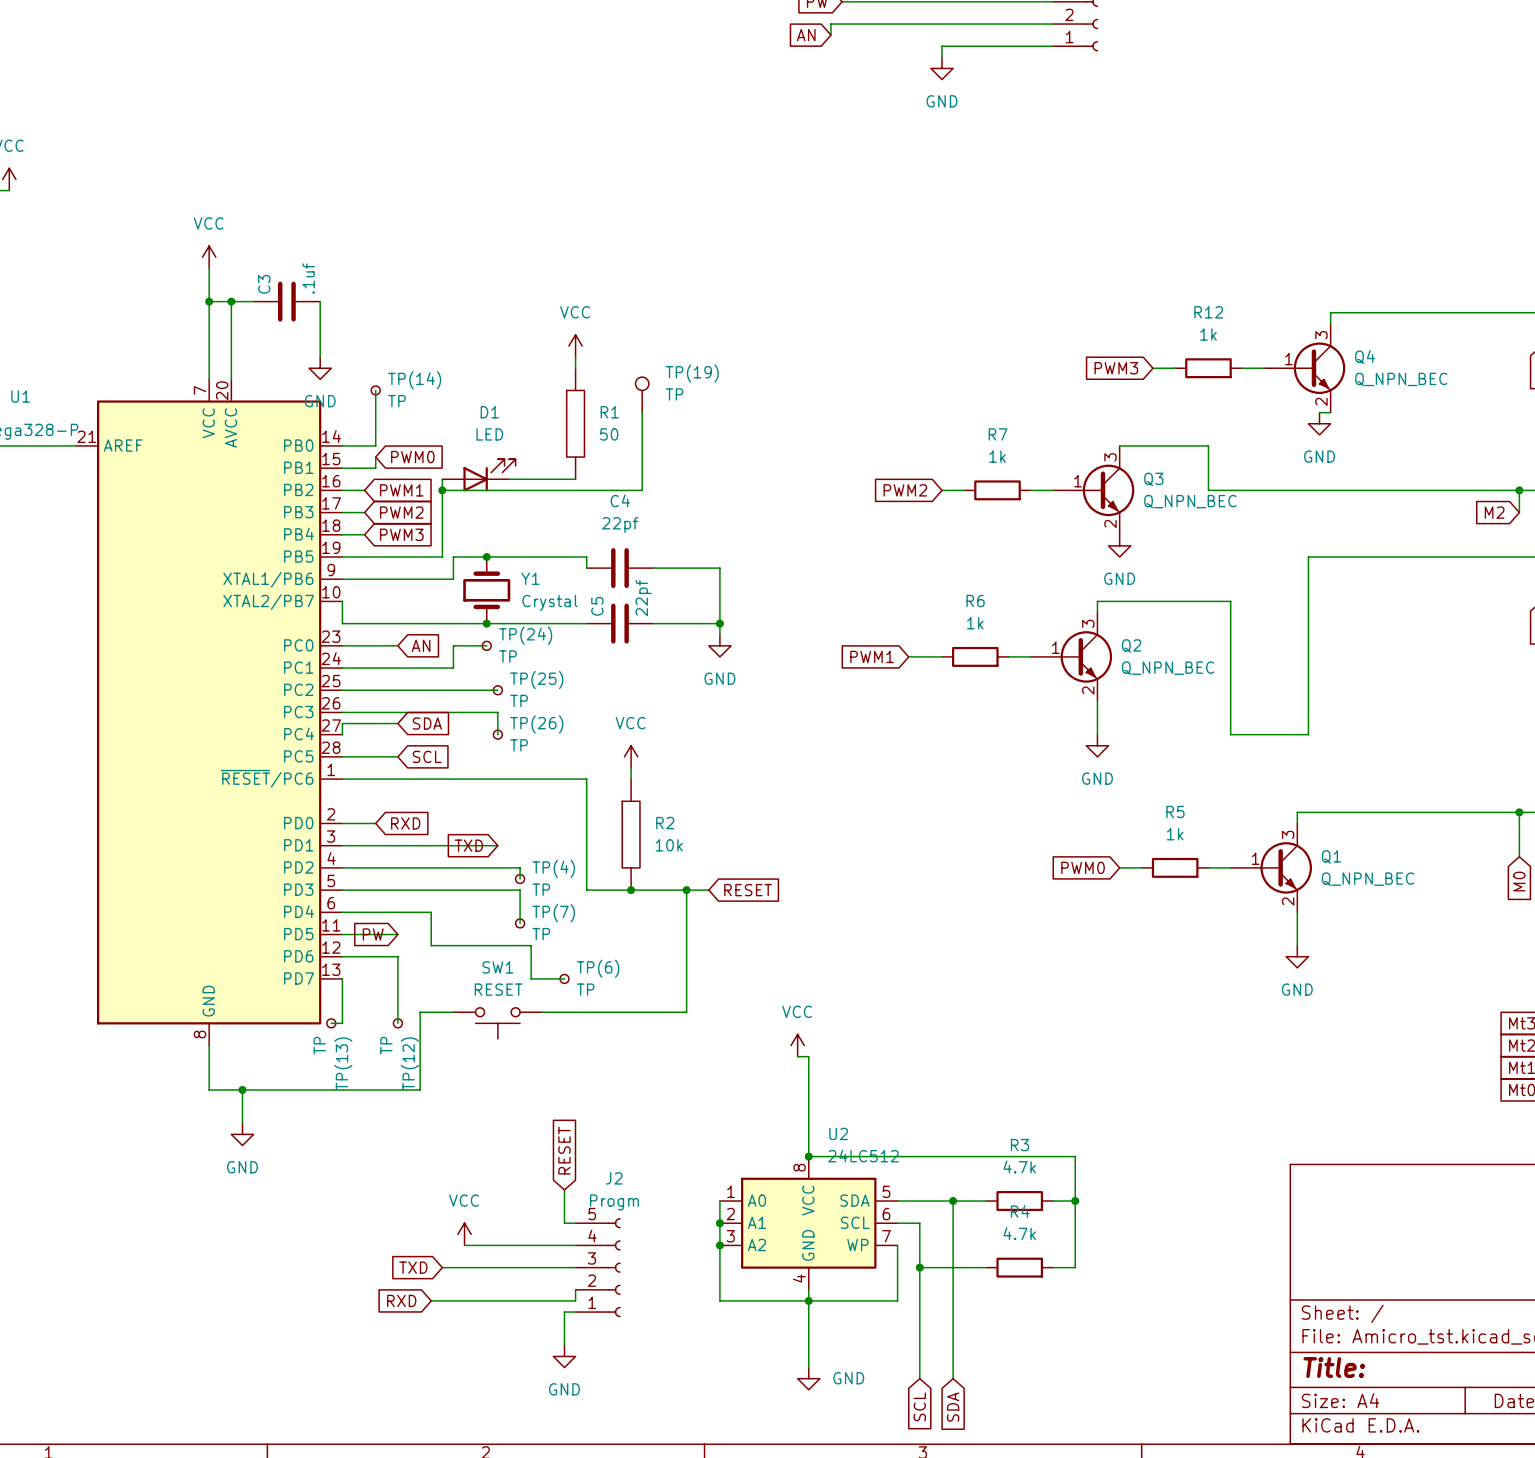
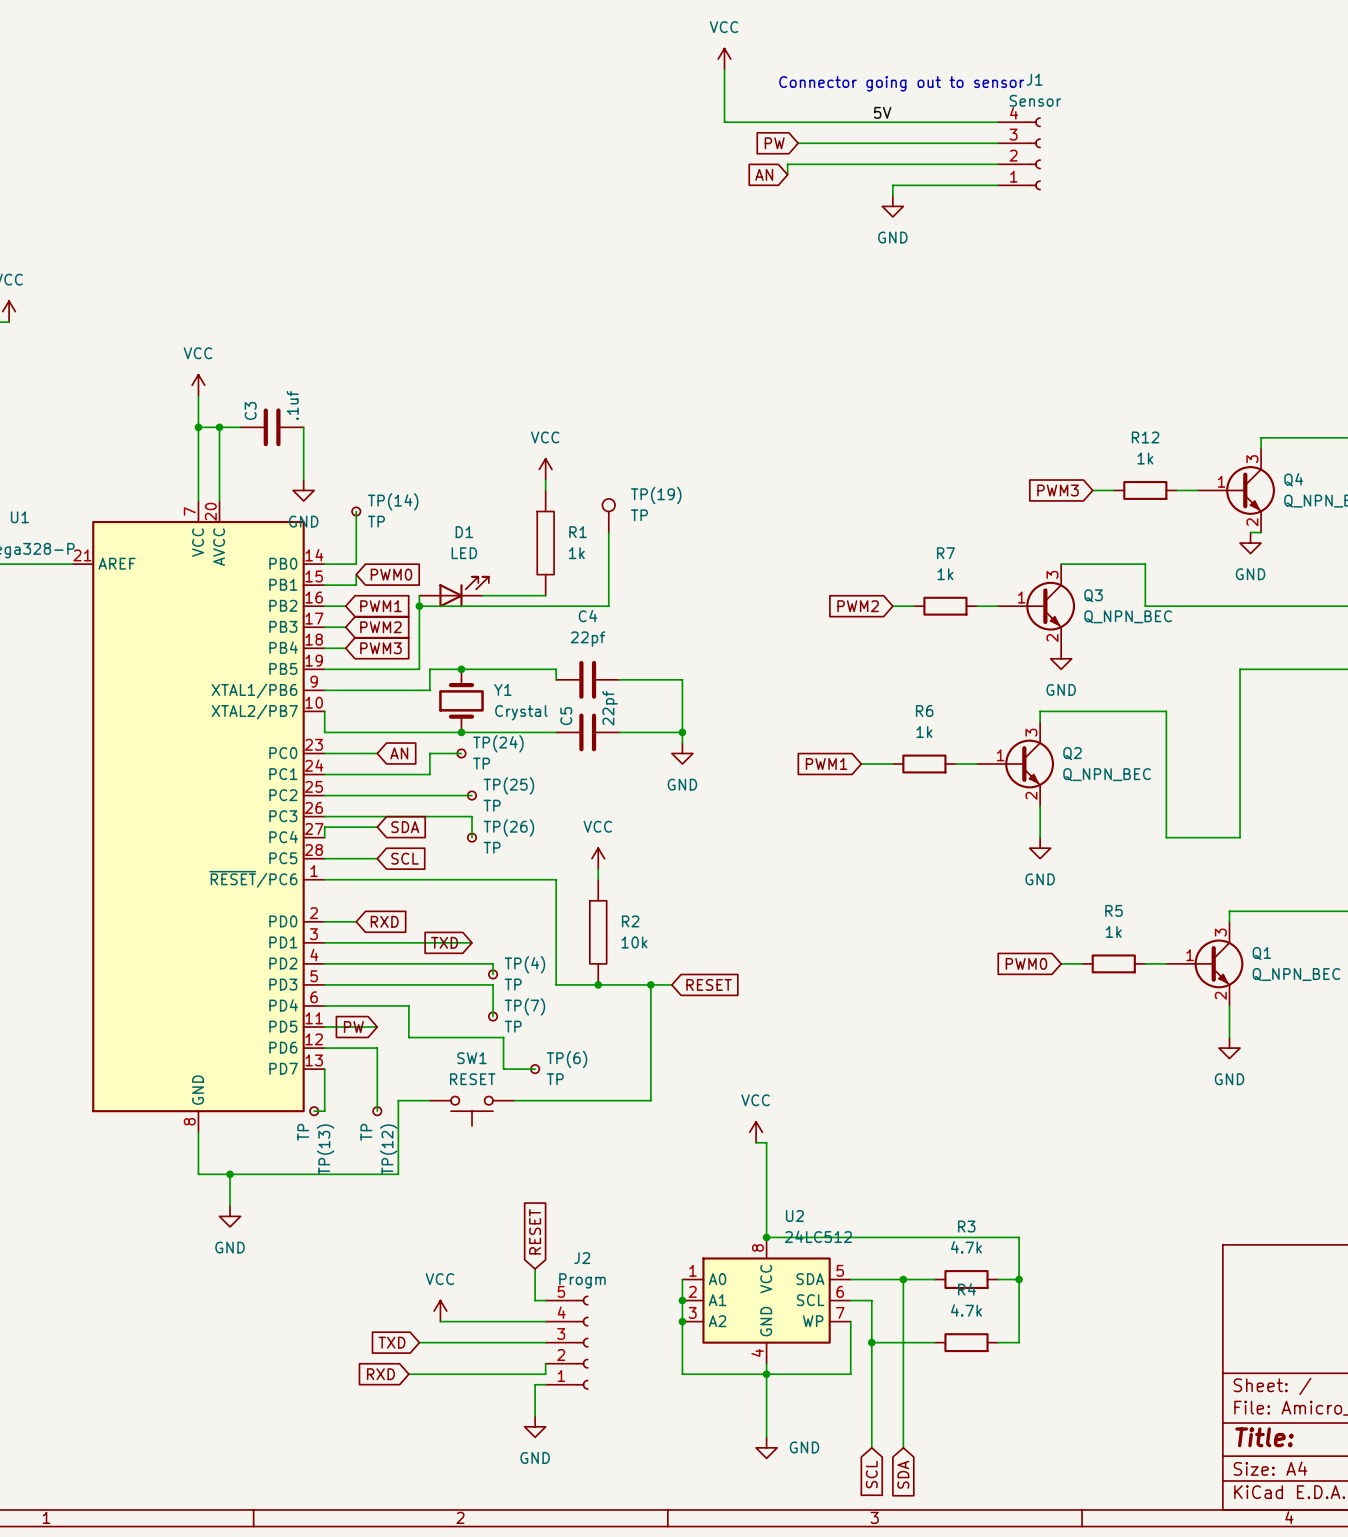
R1 value: 50 (609, 434) -> 1k (576, 553)

